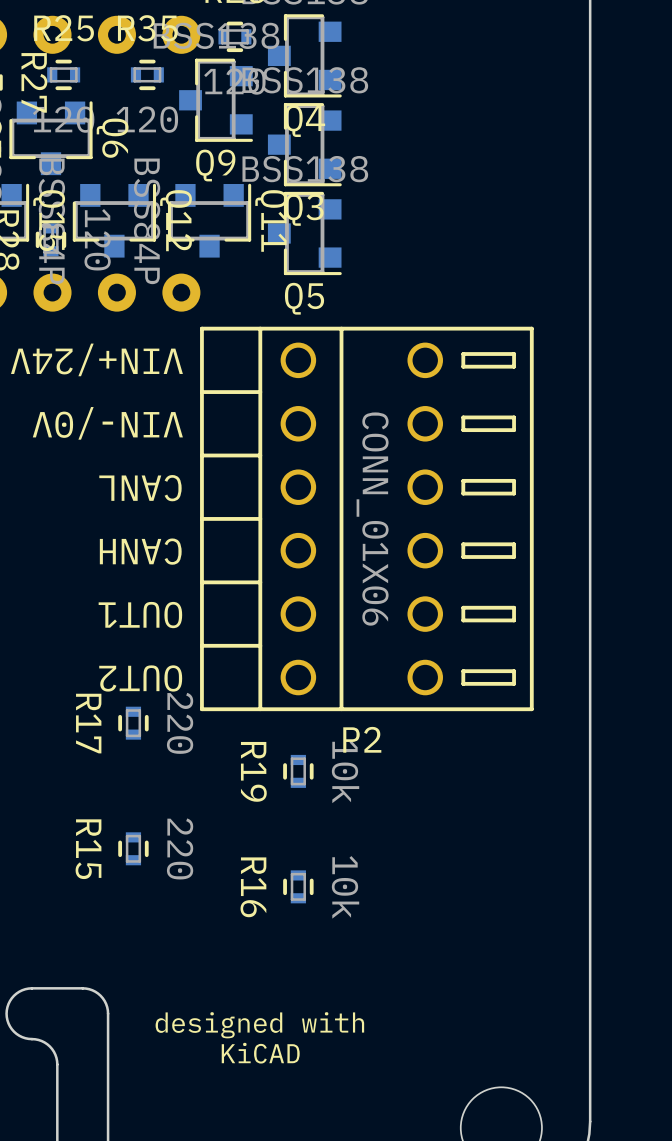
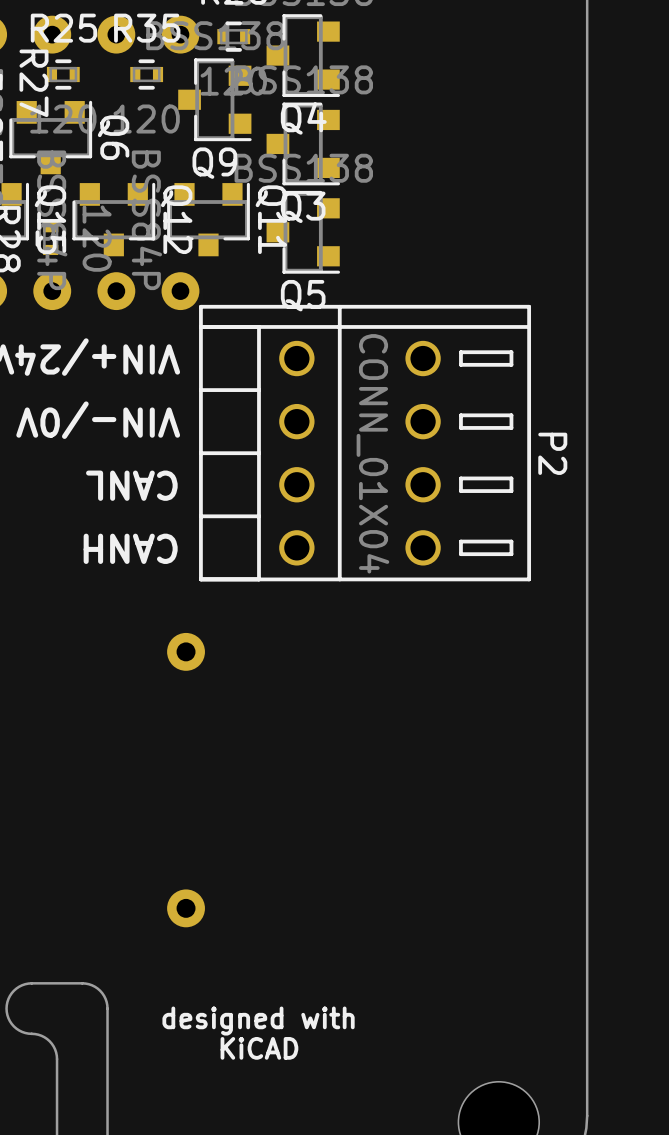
P2 footprint: [200, 326, 534, 712] -> [199, 304, 532, 582]
P2 value: CONN_01X06 (372, 519) -> CONN_01X04 (372, 453)
text: OUT1 (140, 615) -> none
part: none -> (186, 651)
text: OUT2 (140, 678) -> none
R17: 220 (133, 723) -> none
P2 name position: P2 (362, 739) -> P2 (552, 453)
R19: 10k (298, 771) -> none
R15: 220 (133, 848) -> none
R16: 10k (298, 886) -> none
part: none -> (186, 908)

